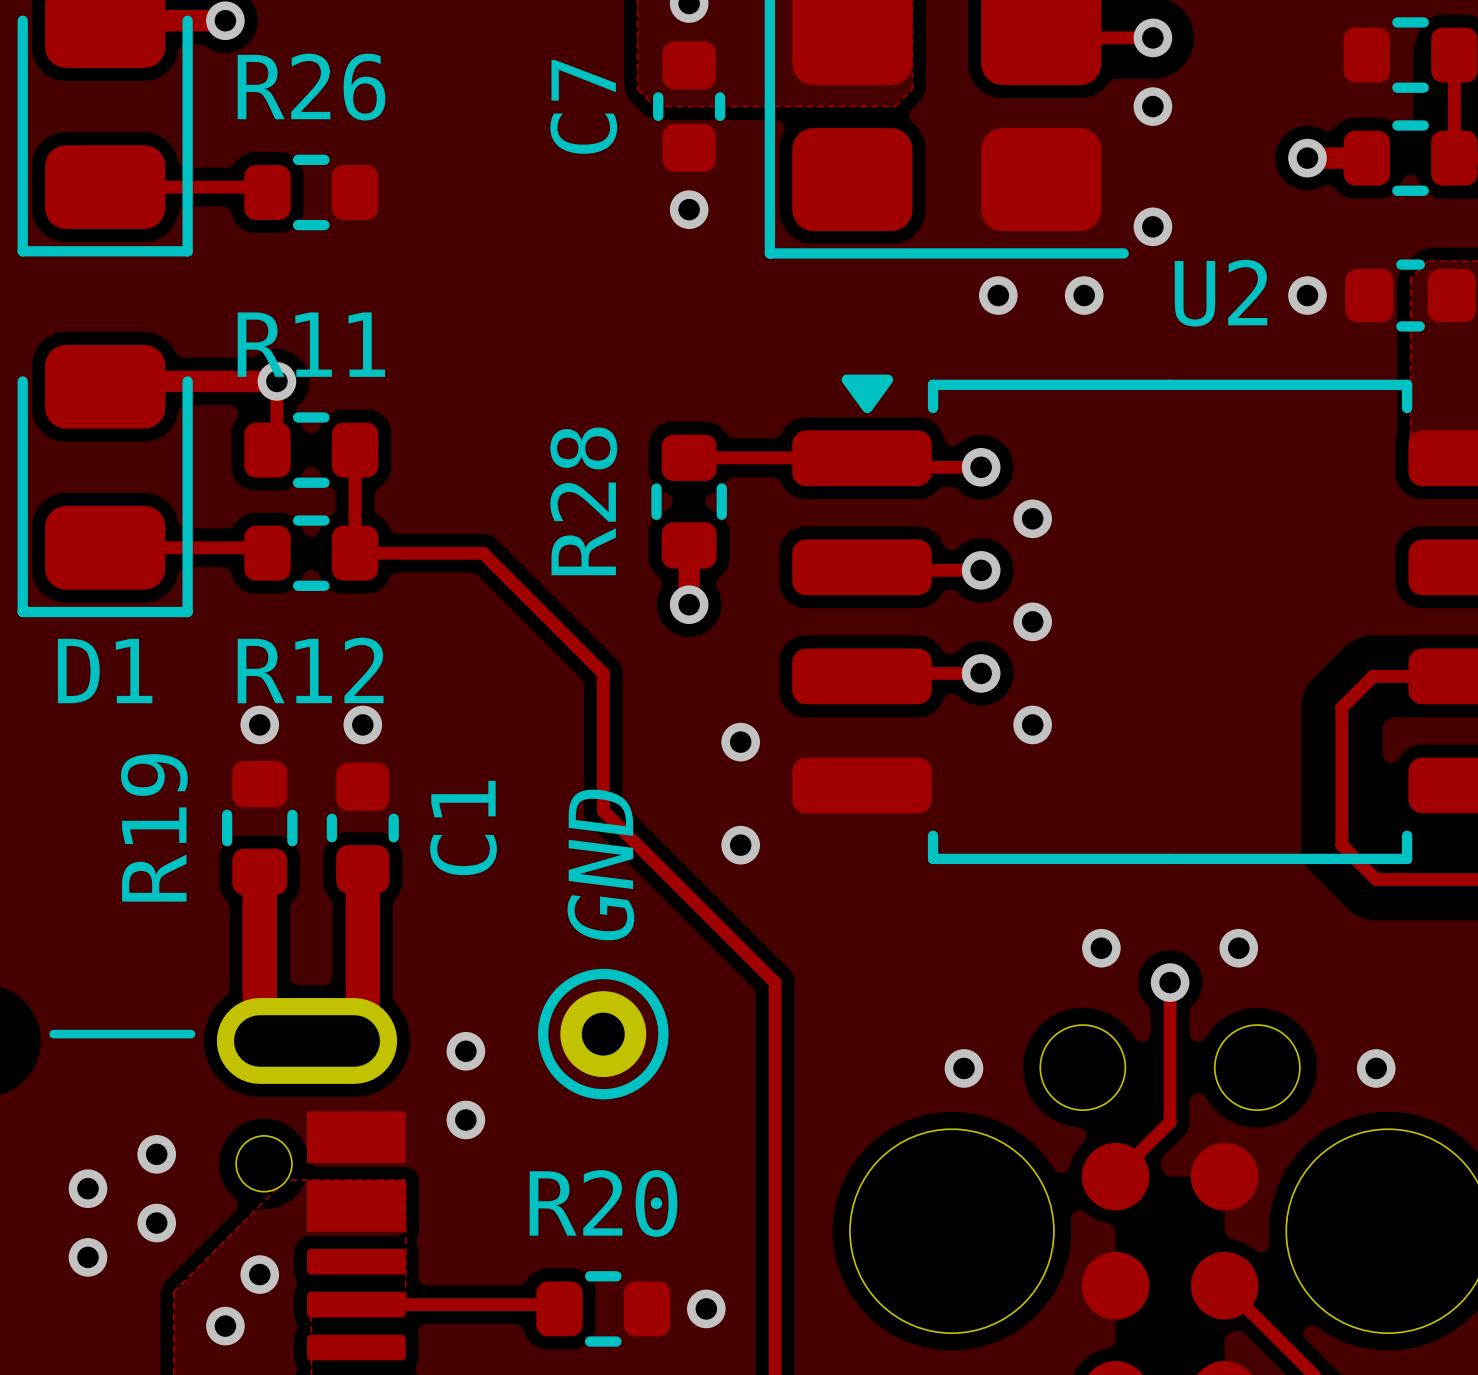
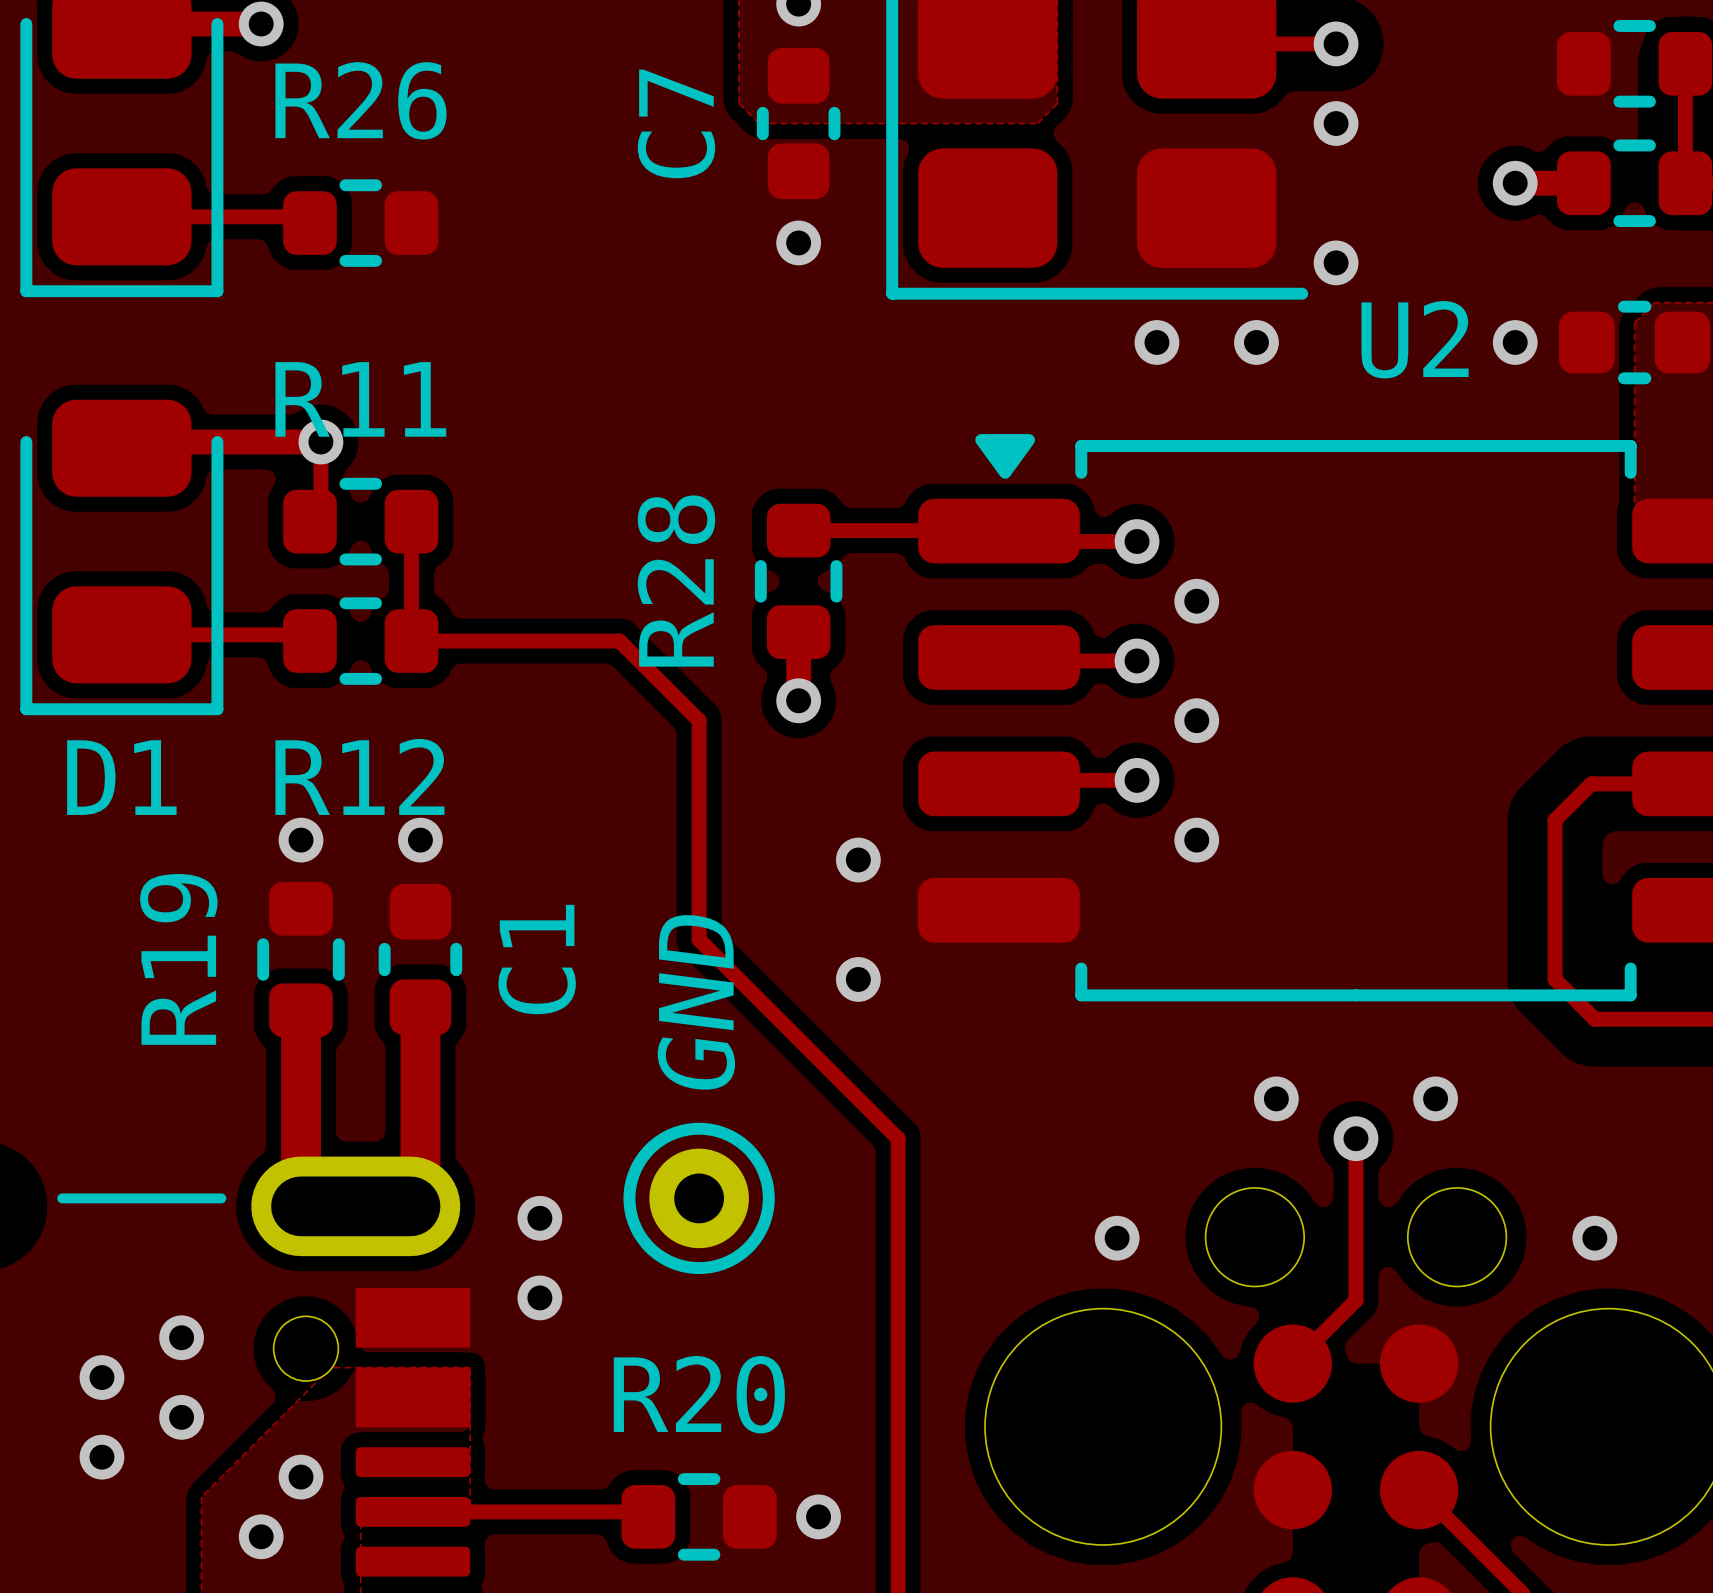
track: (483, 553) (603, 673) -> (559, 641) (619, 641) (699, 720) (699, 780)

